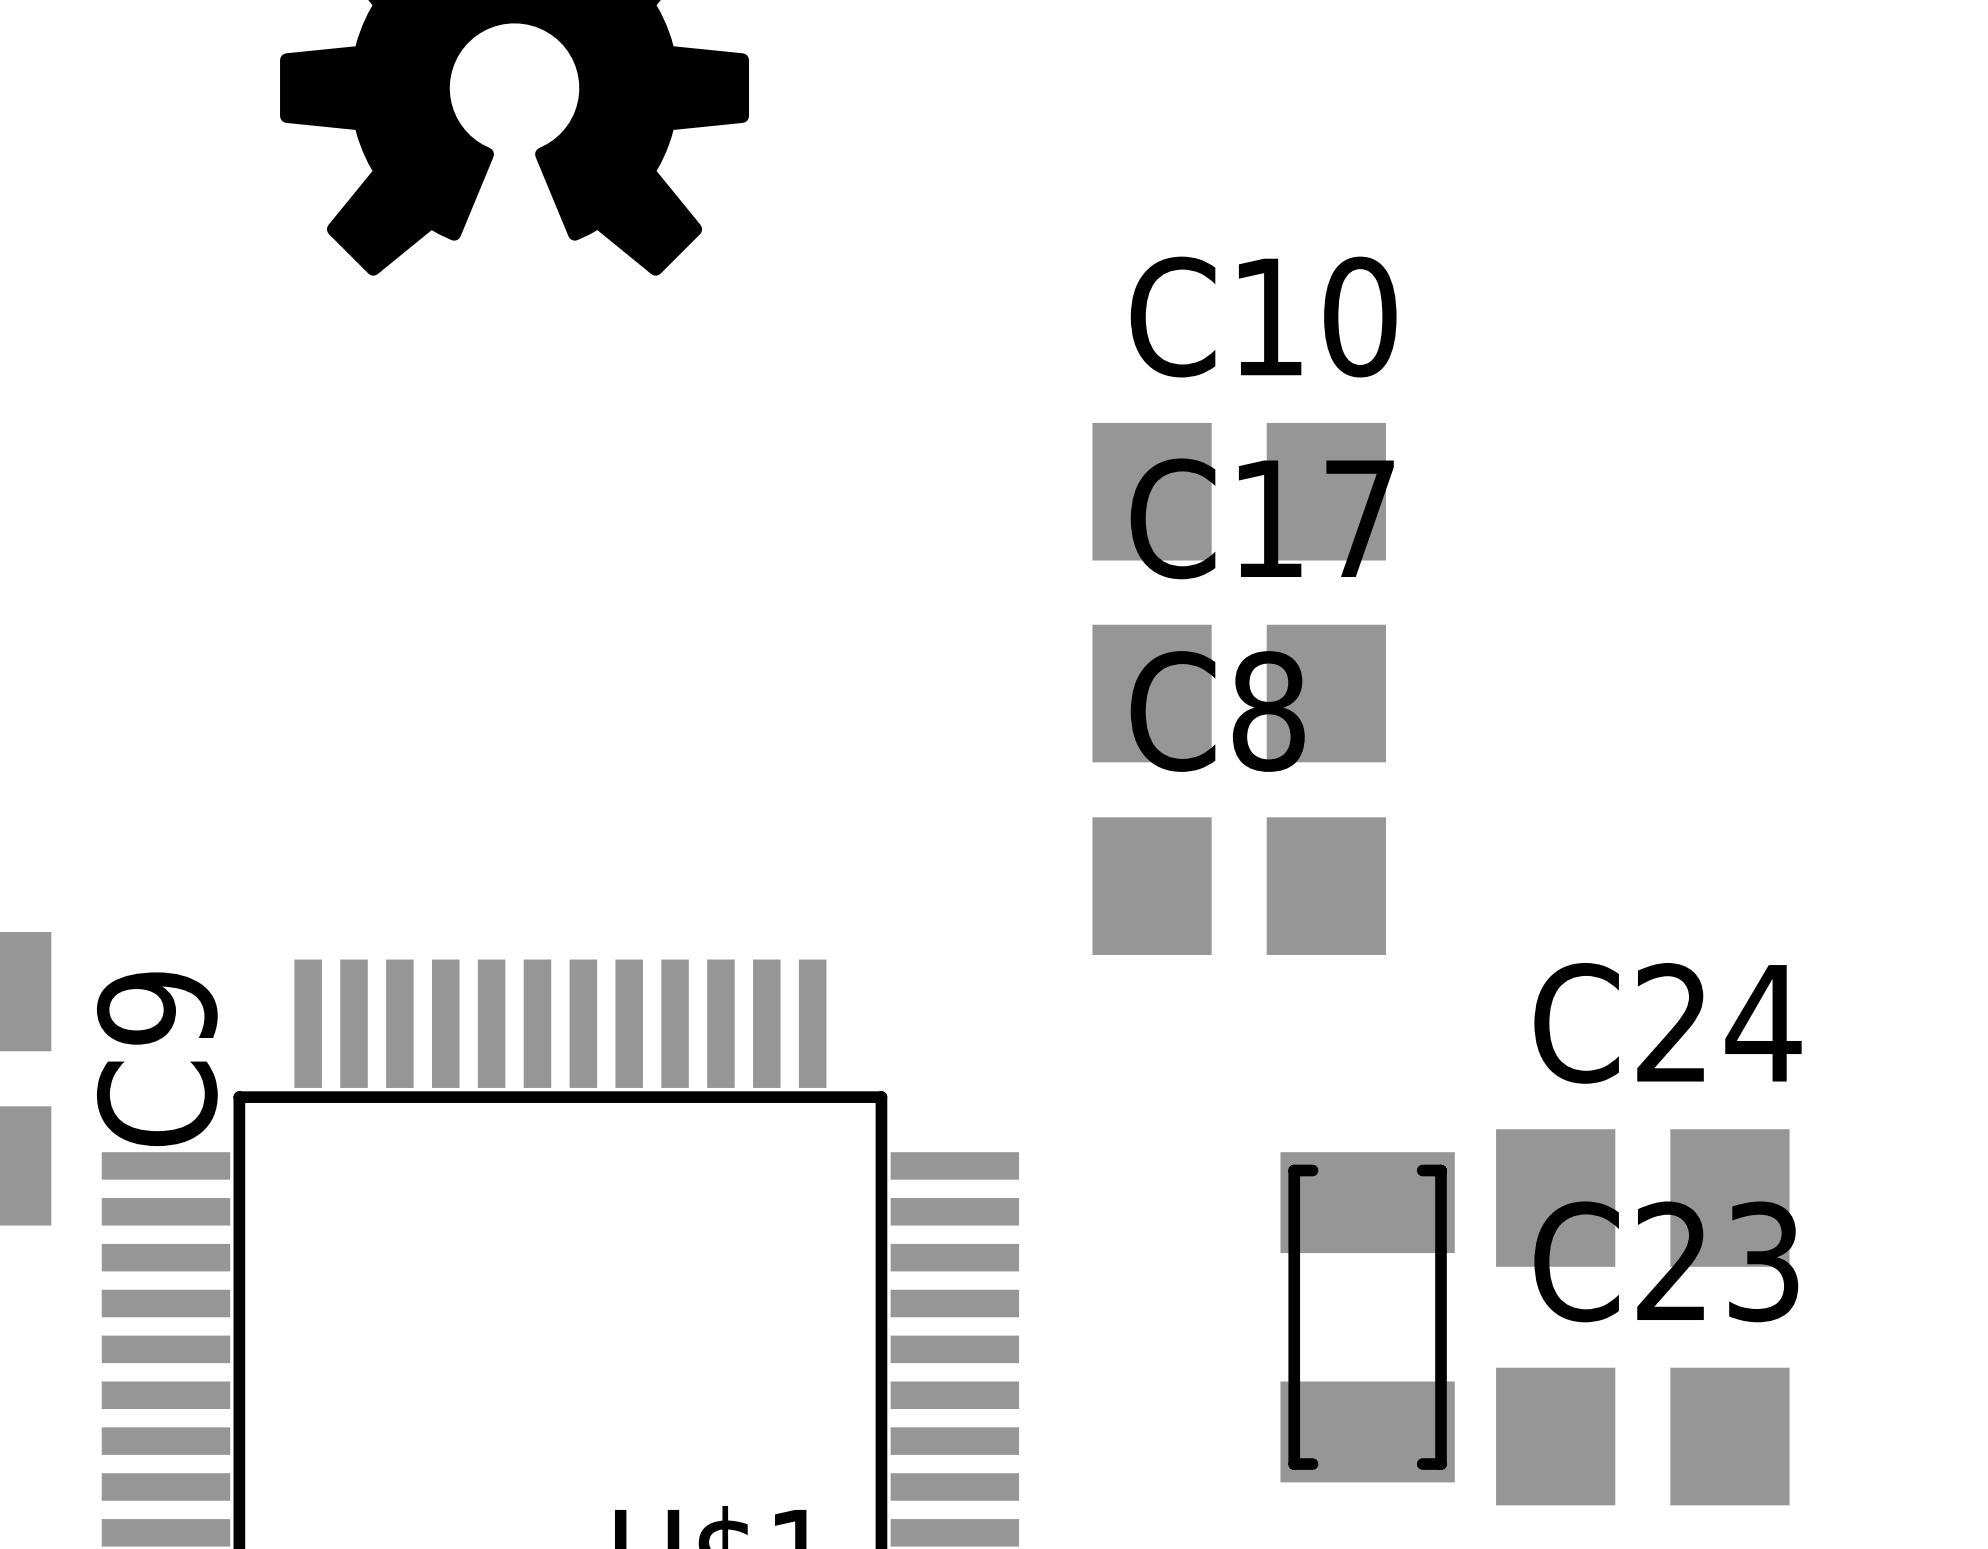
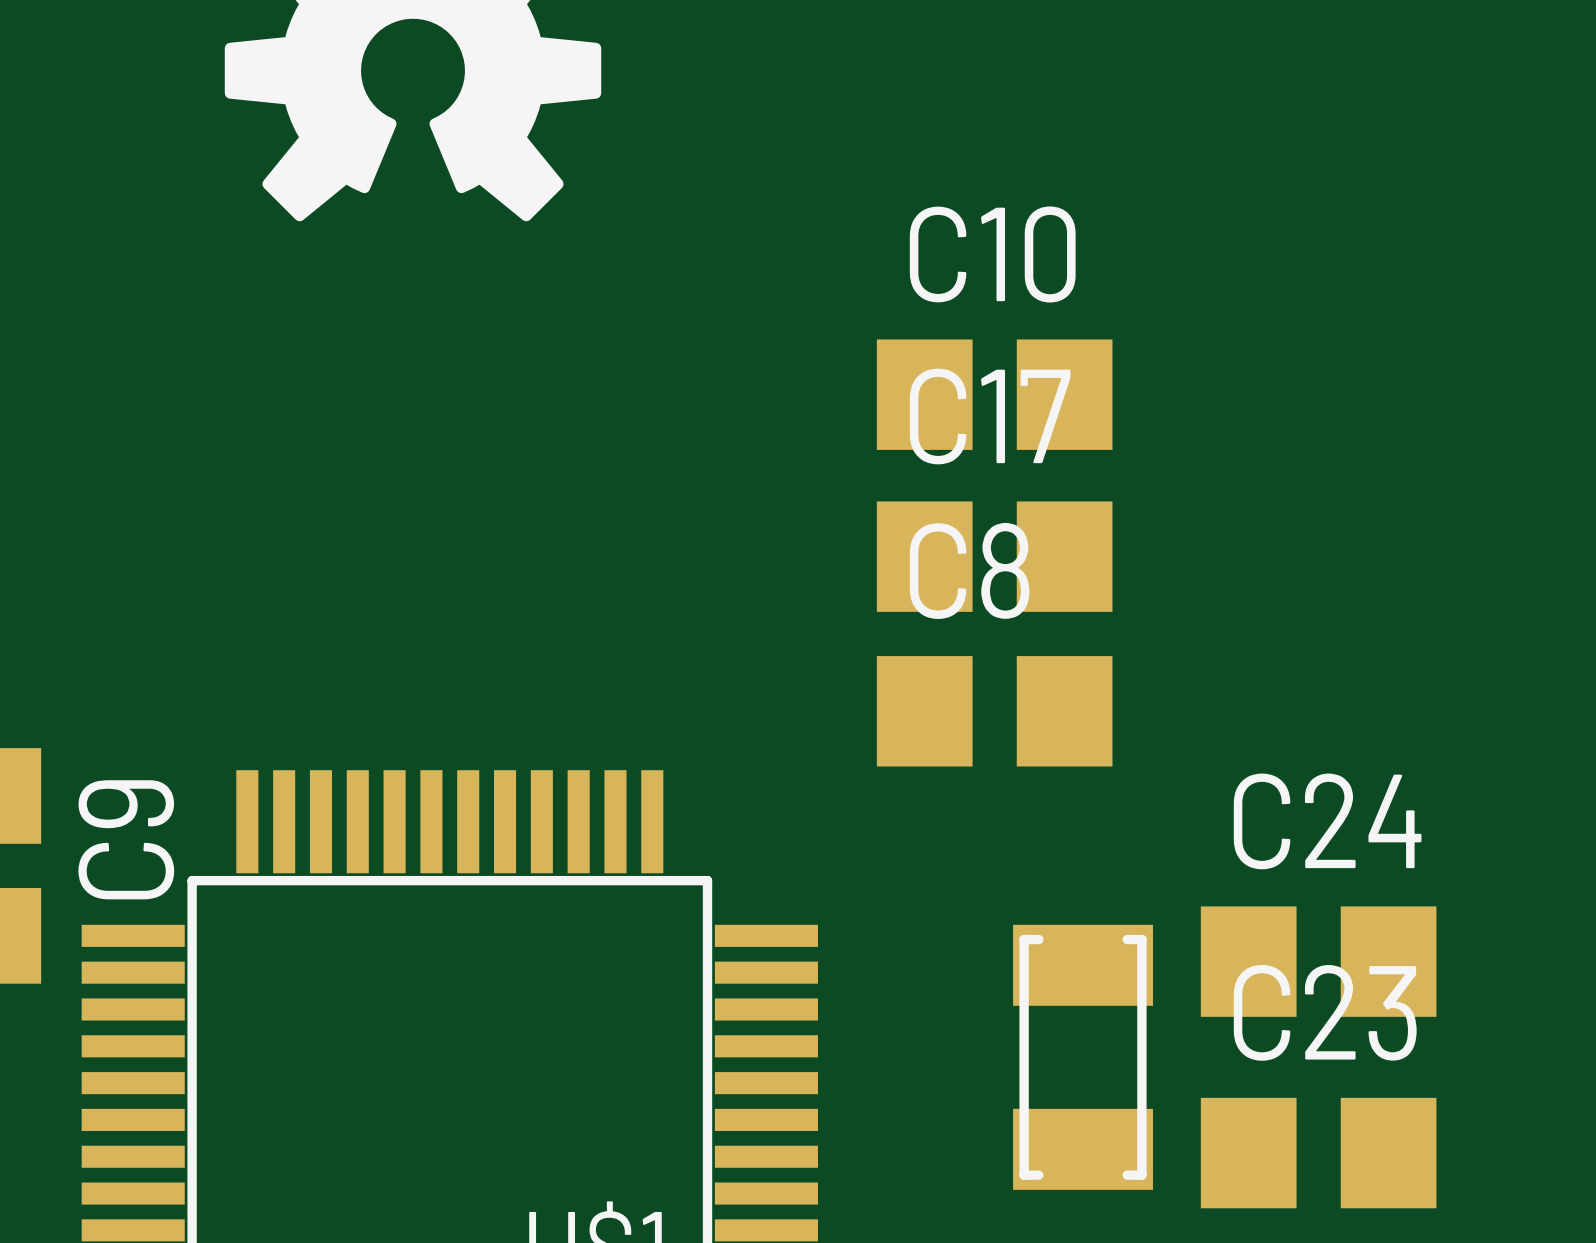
part position: (1367, 1317) -> (1083, 1057)

